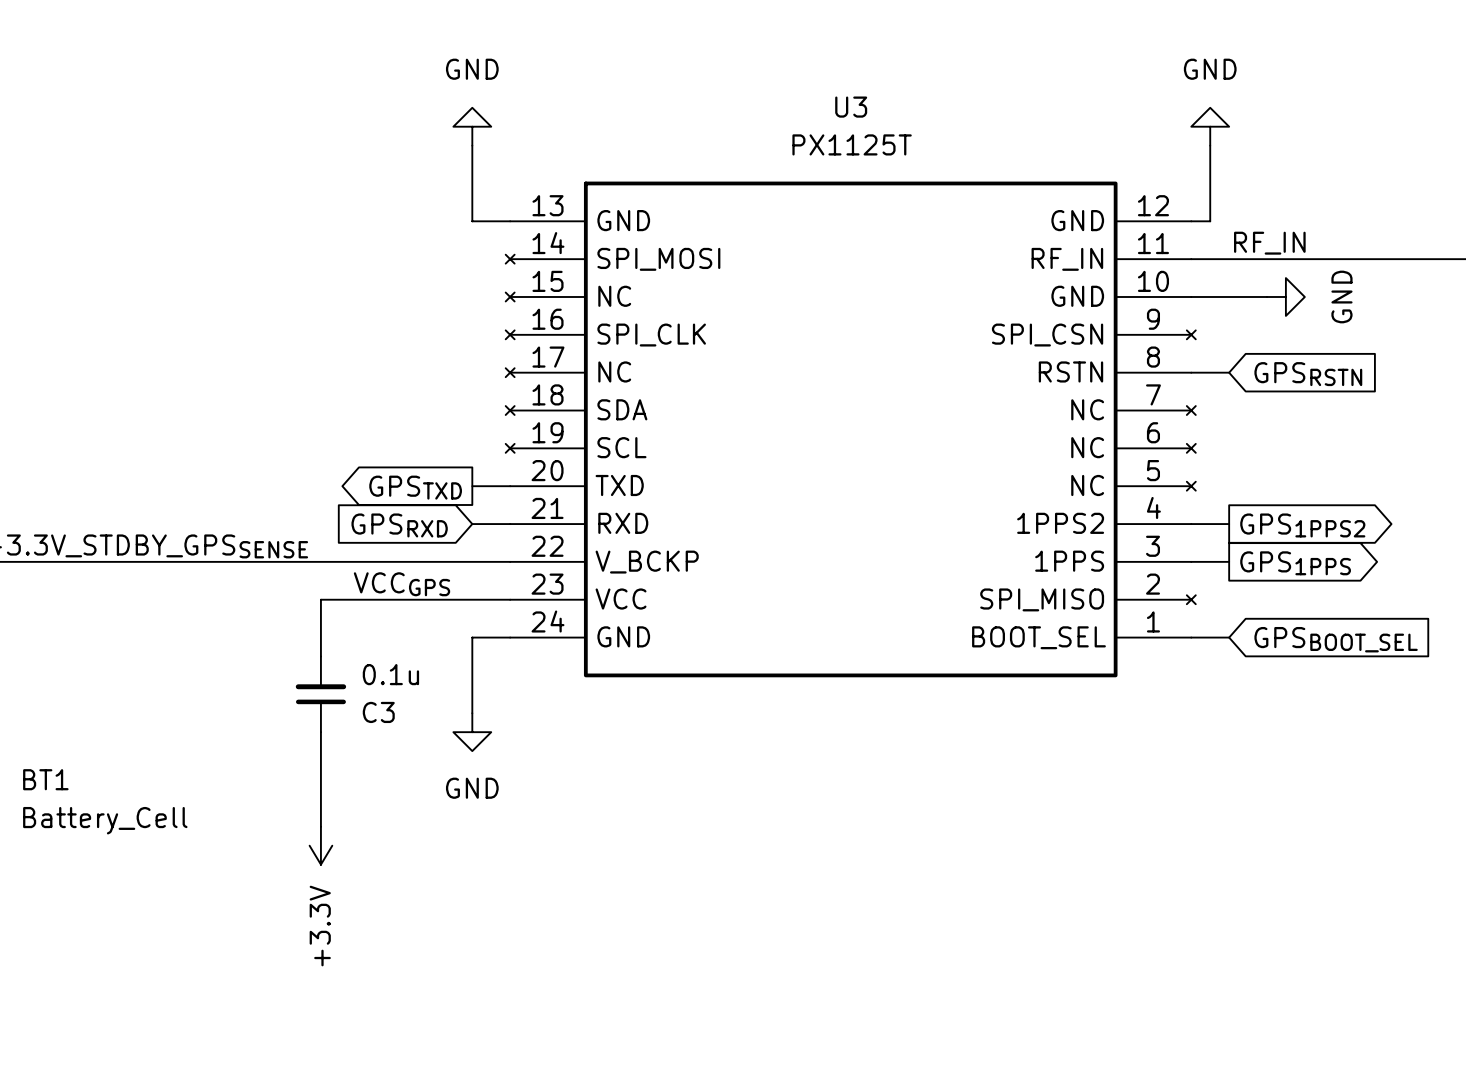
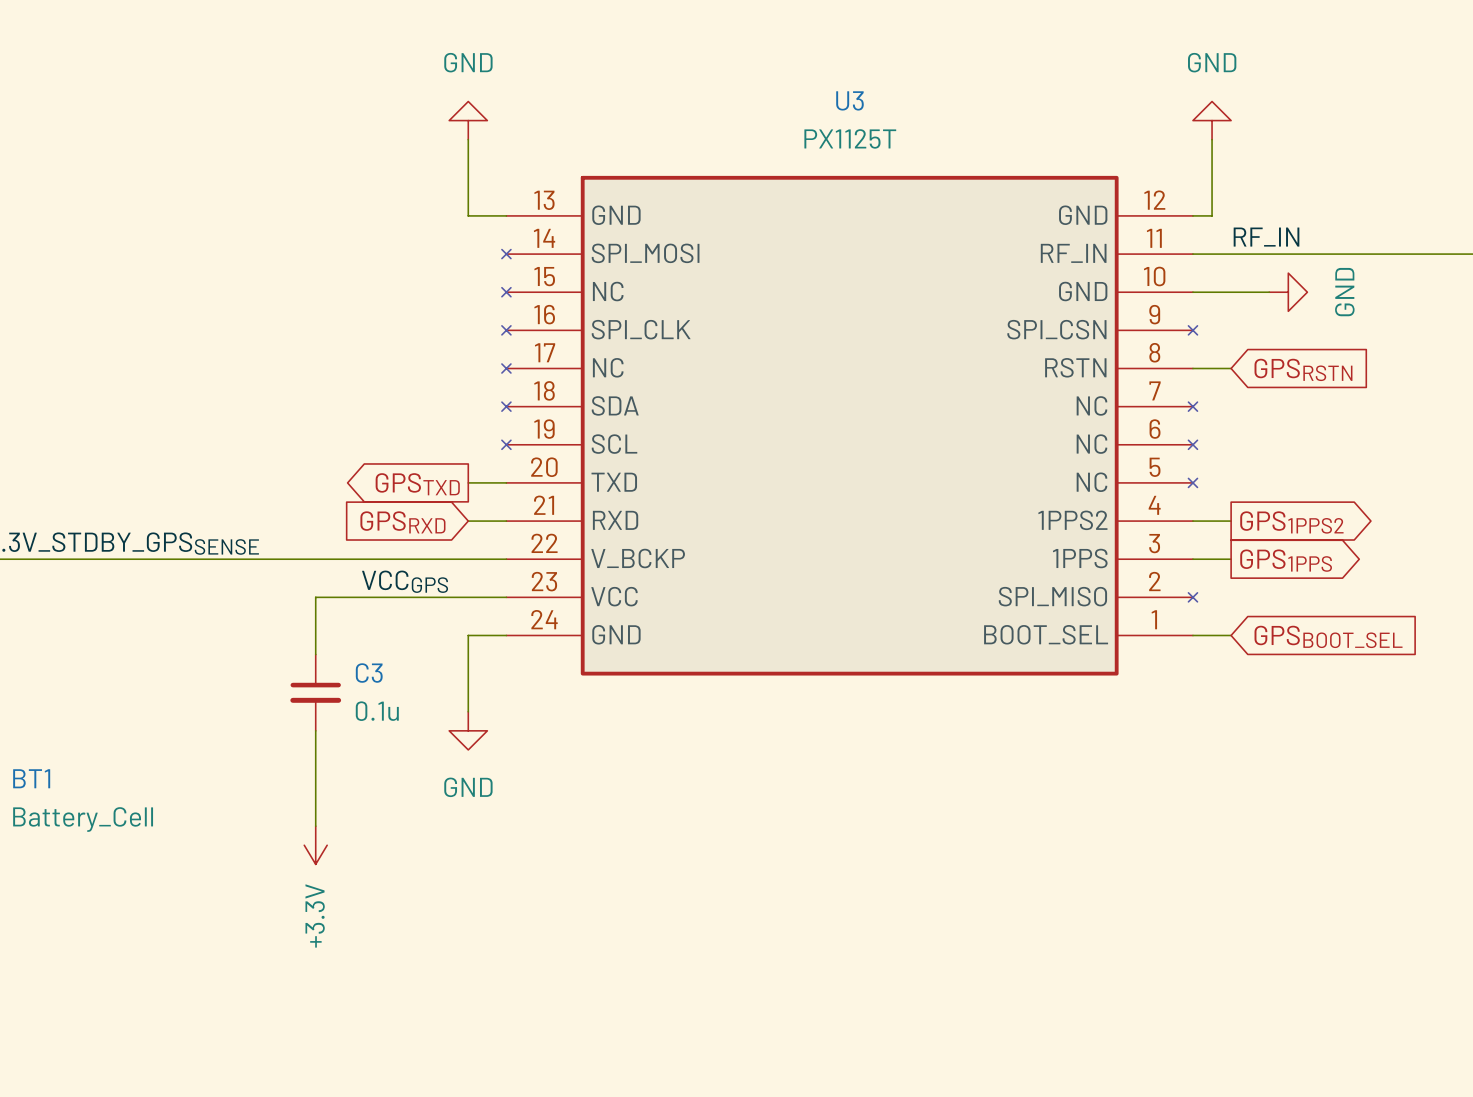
C3 value position: 0.1u (390, 674) -> 0.1u (377, 711)
C3 rotation: 0° (320, 694) -> 180° (315, 692)
C3 name position: C3 (378, 712) -> C3 (369, 673)

